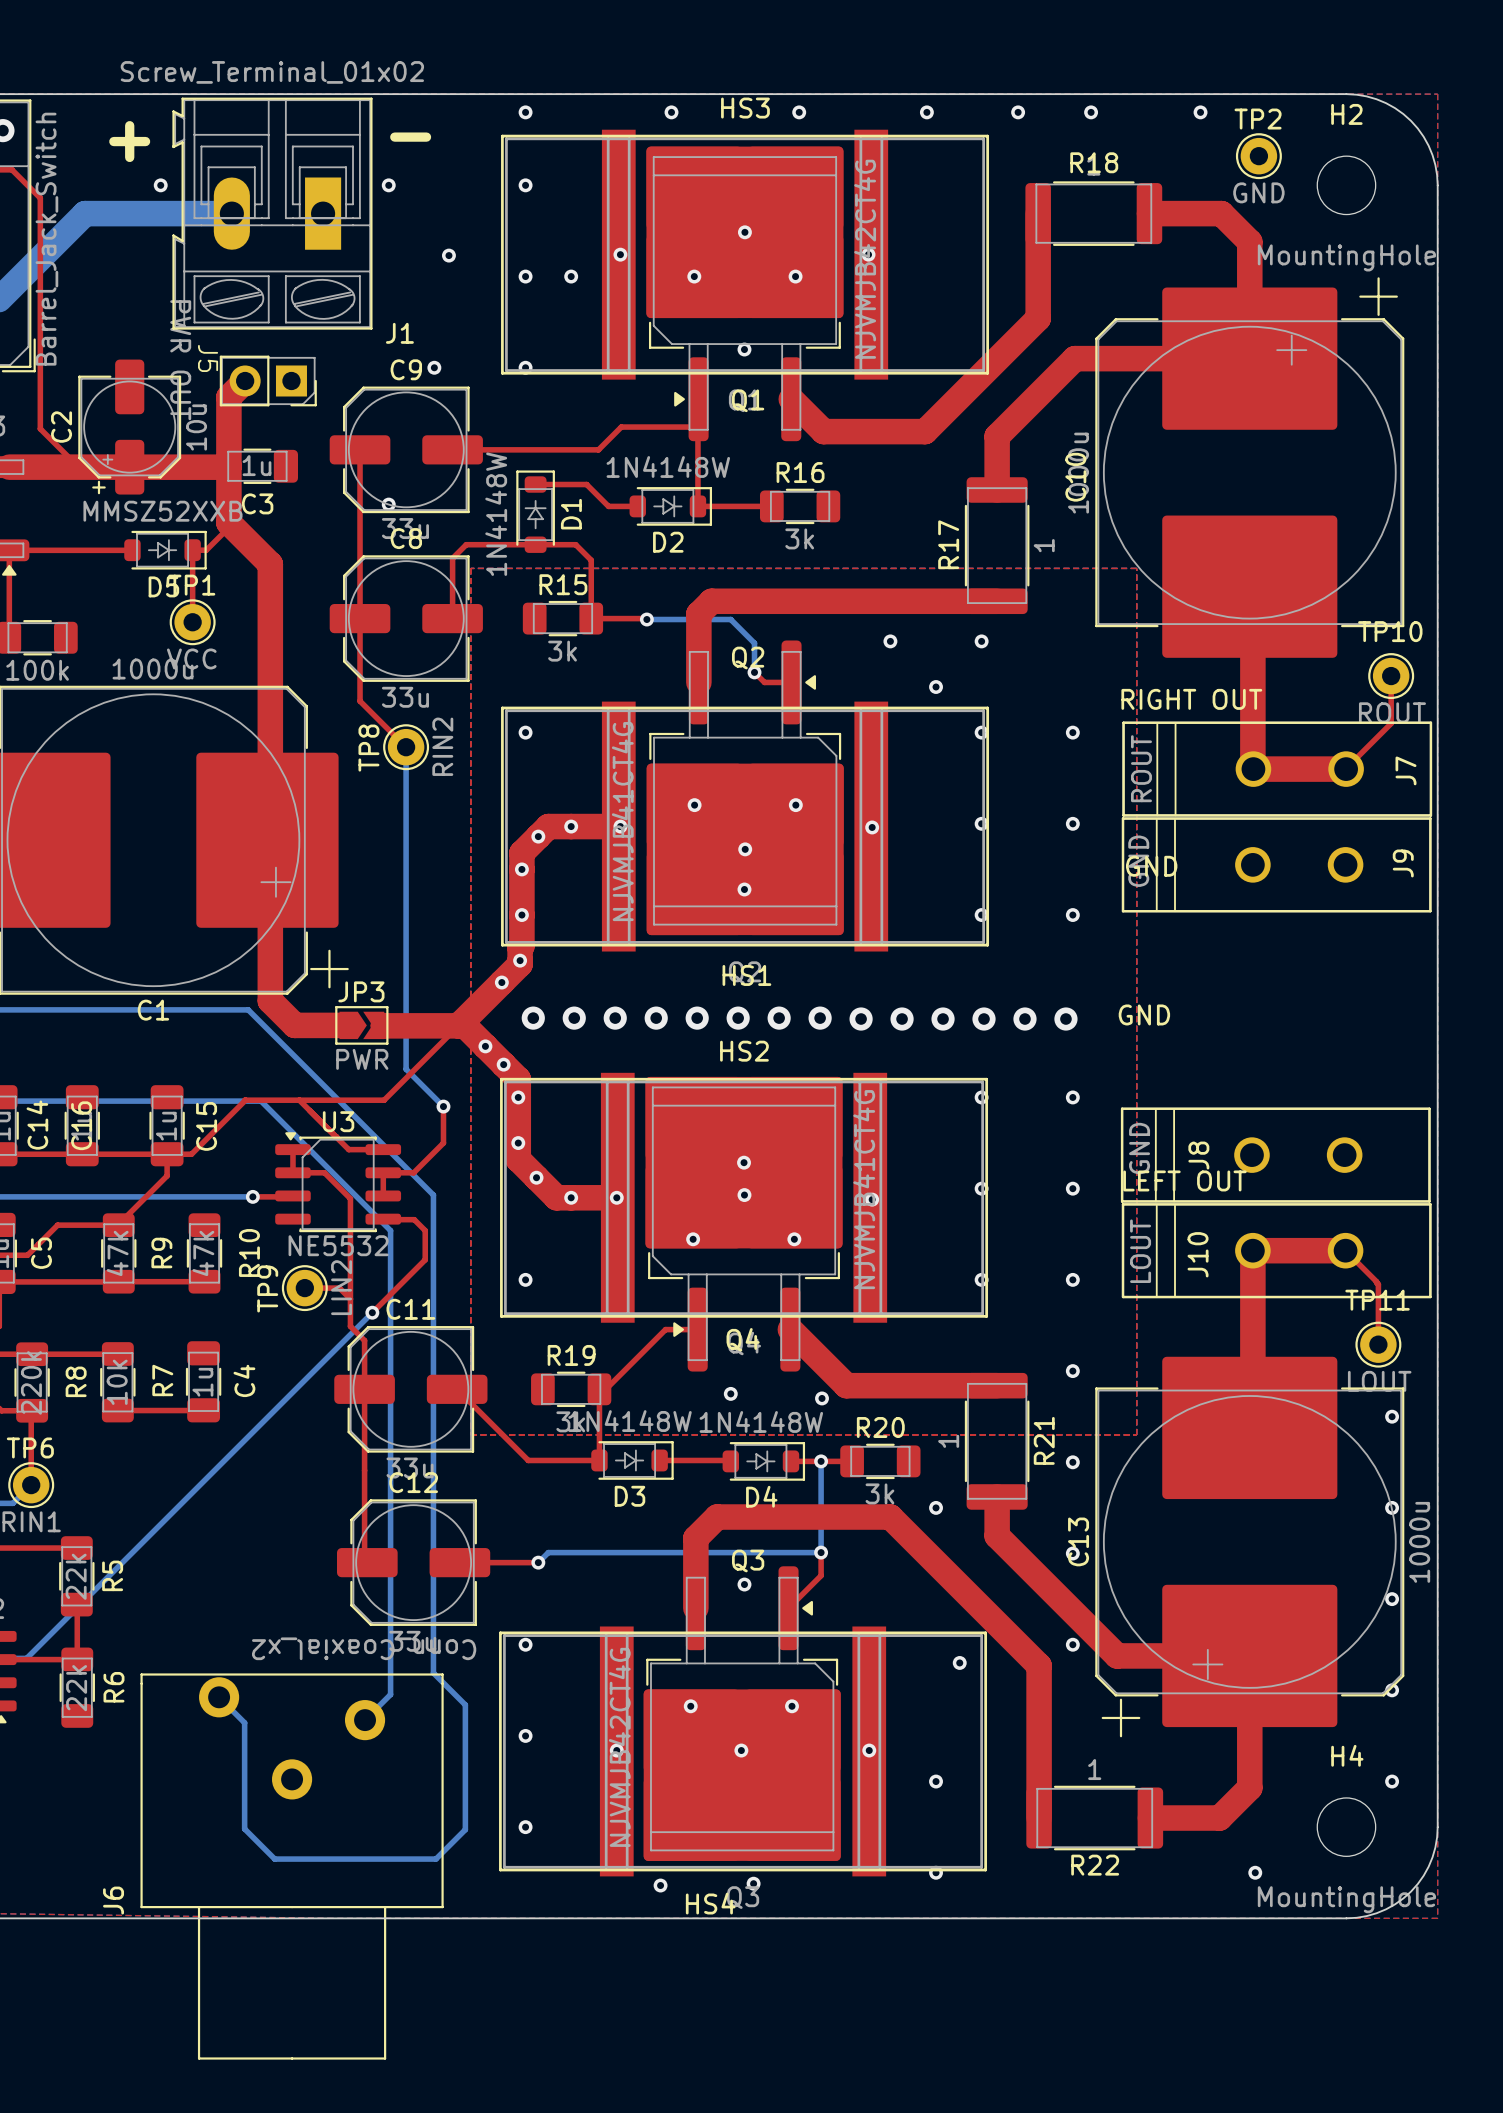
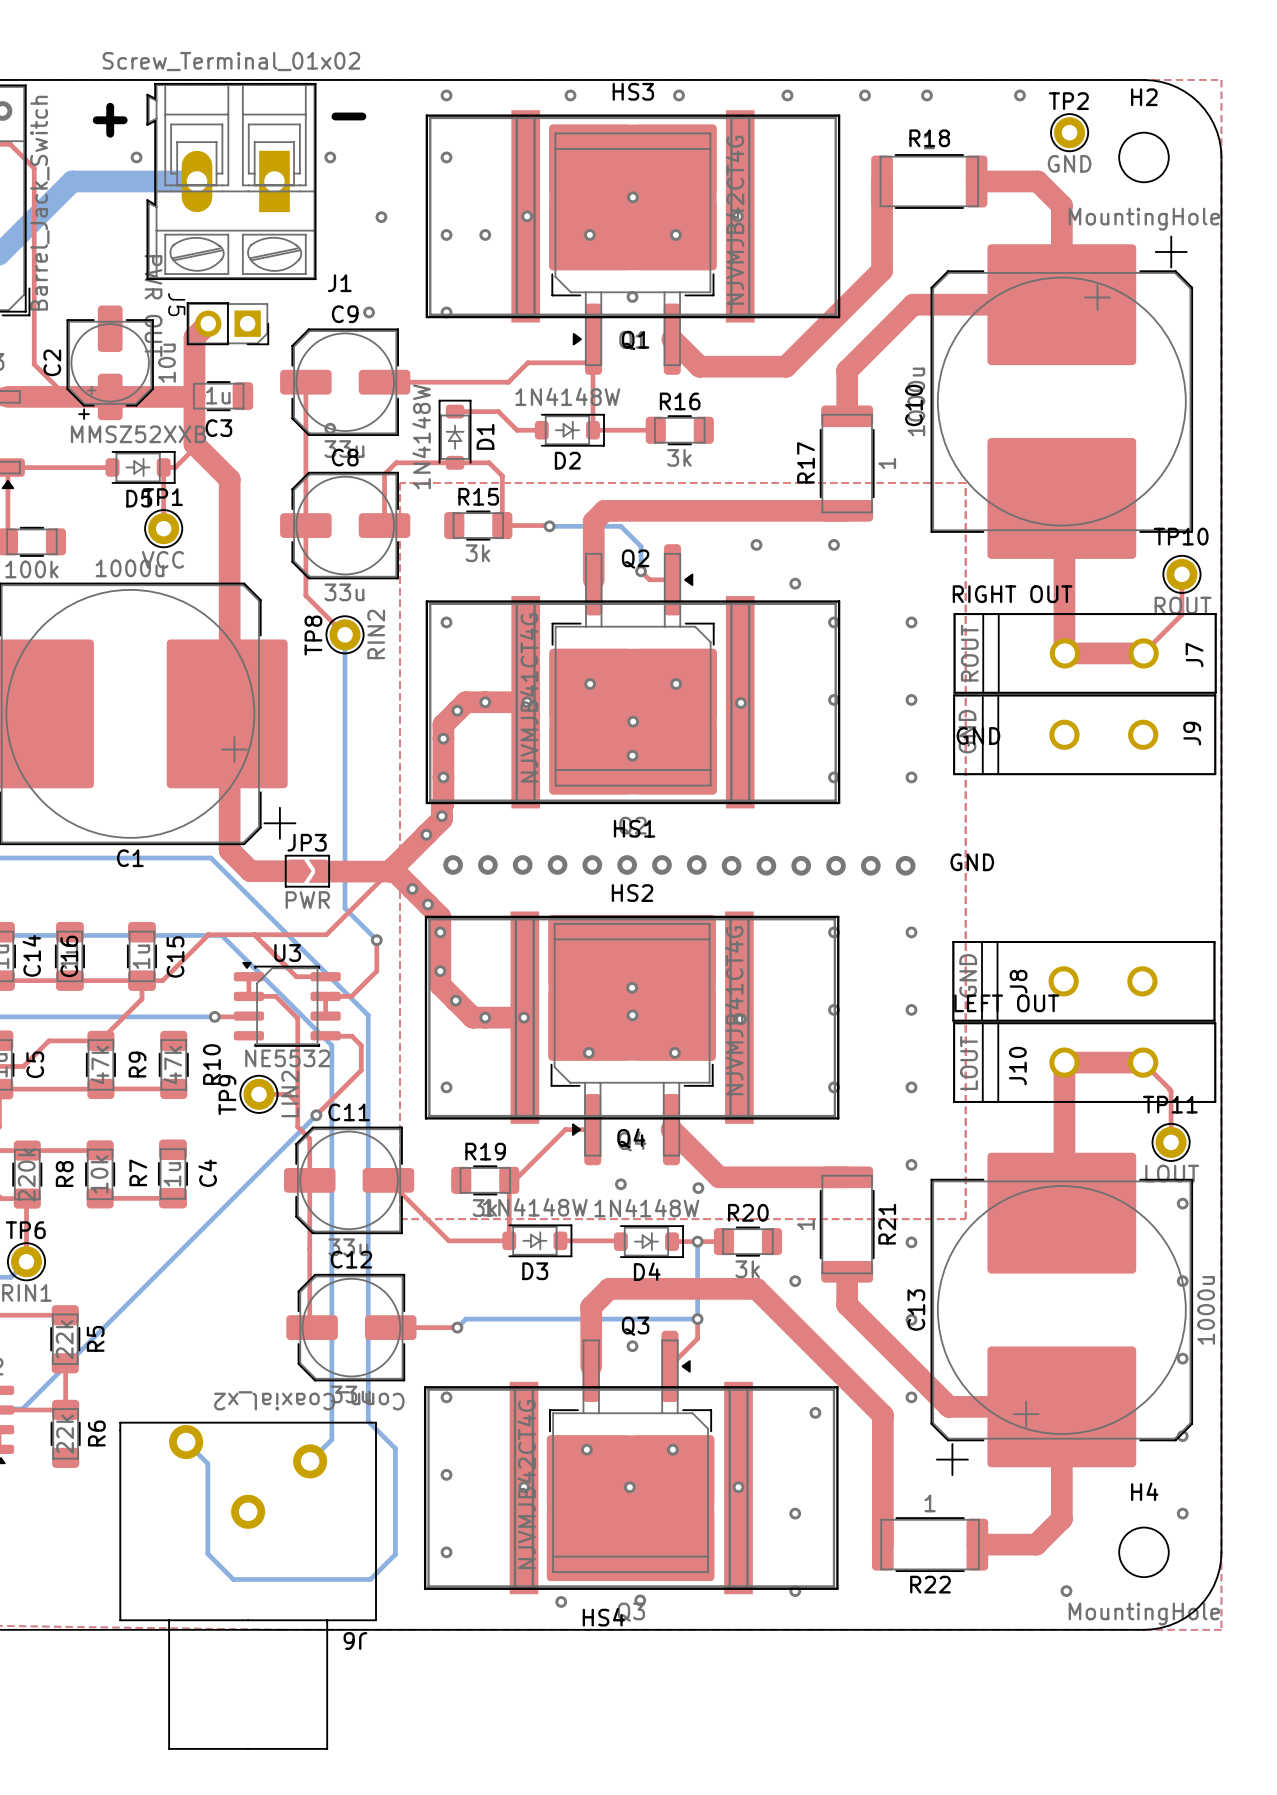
J6 name rotation: 0° (113, 1900) -> 90° counterclockwise (355, 1641)
J6 name position: J6 (113, 1900) -> J6 (355, 1641)

